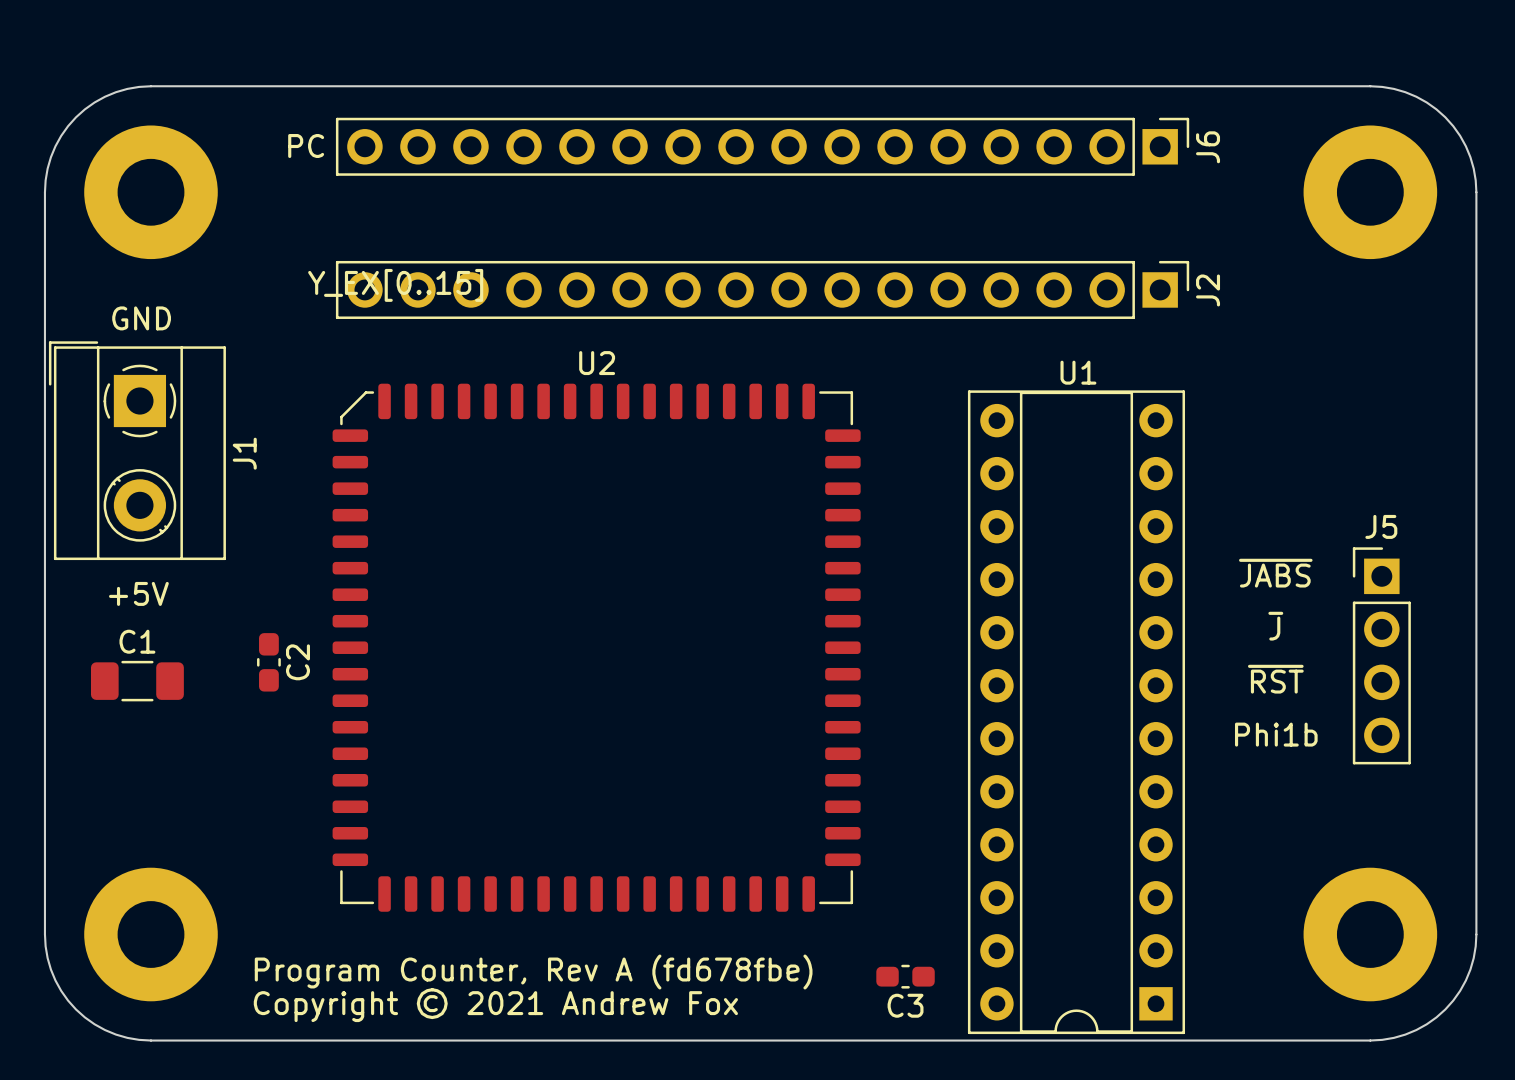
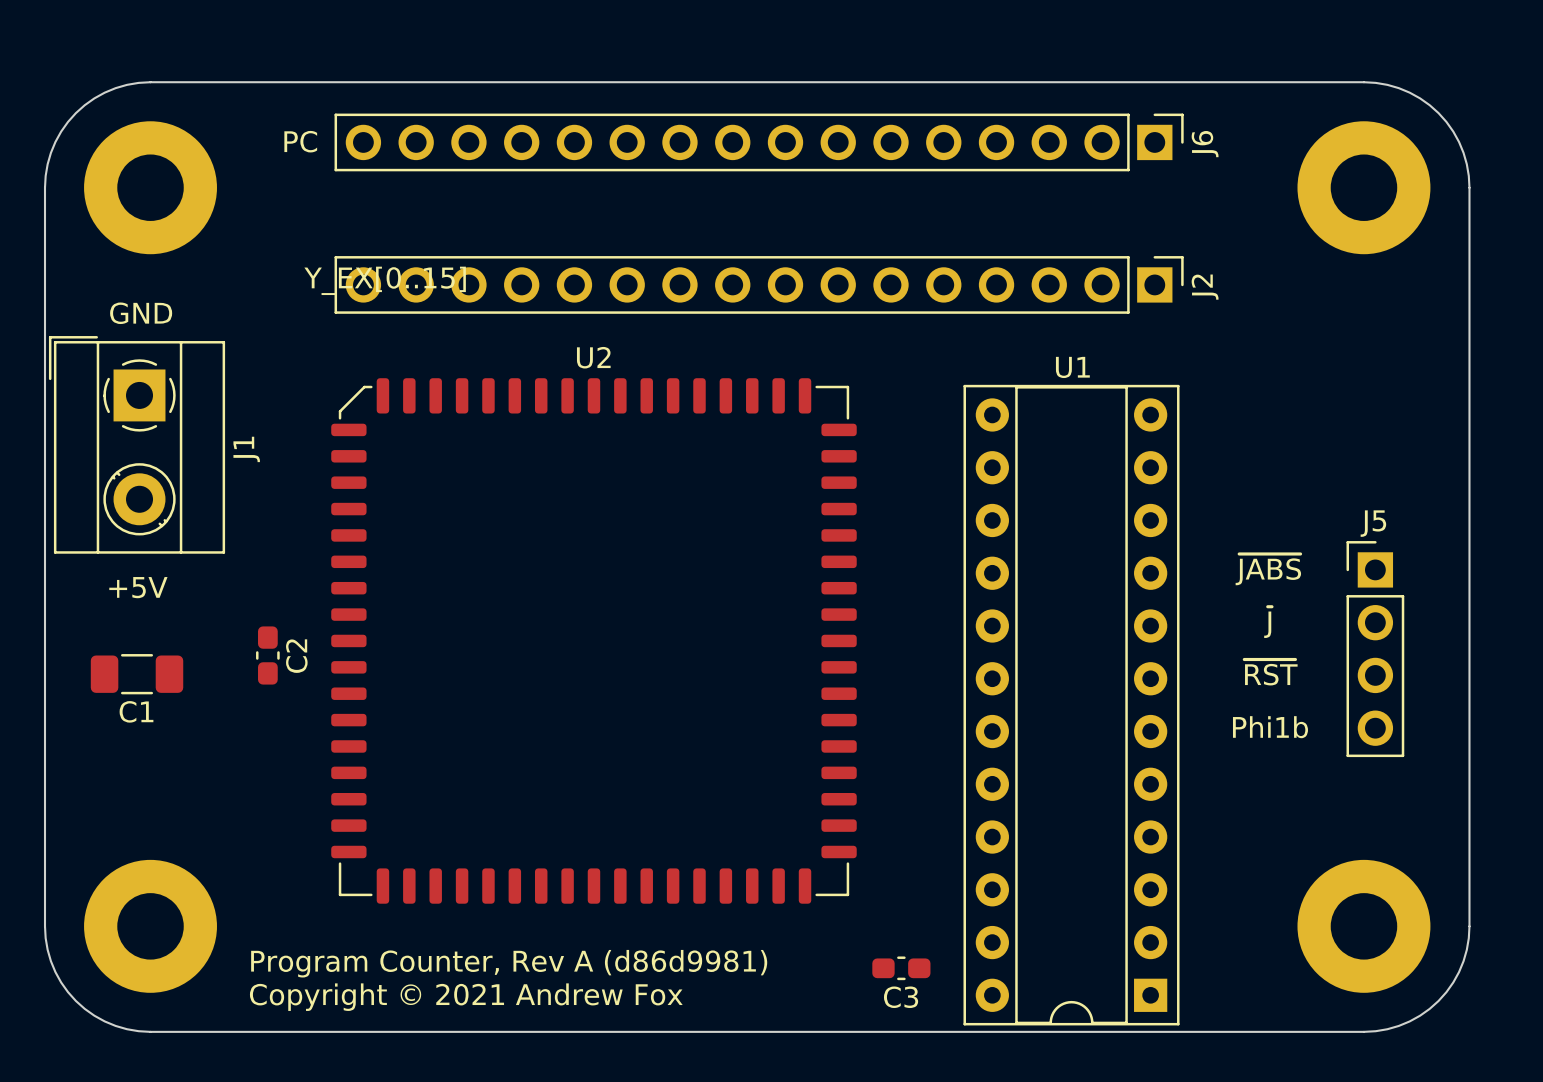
C1 name position: C1 (137, 641) -> C1 (136, 711)
text: Program Counter, Rev A (fd678fbe) (533, 972) -> Program Counter, Rev A (d86d9981) (509, 963)

